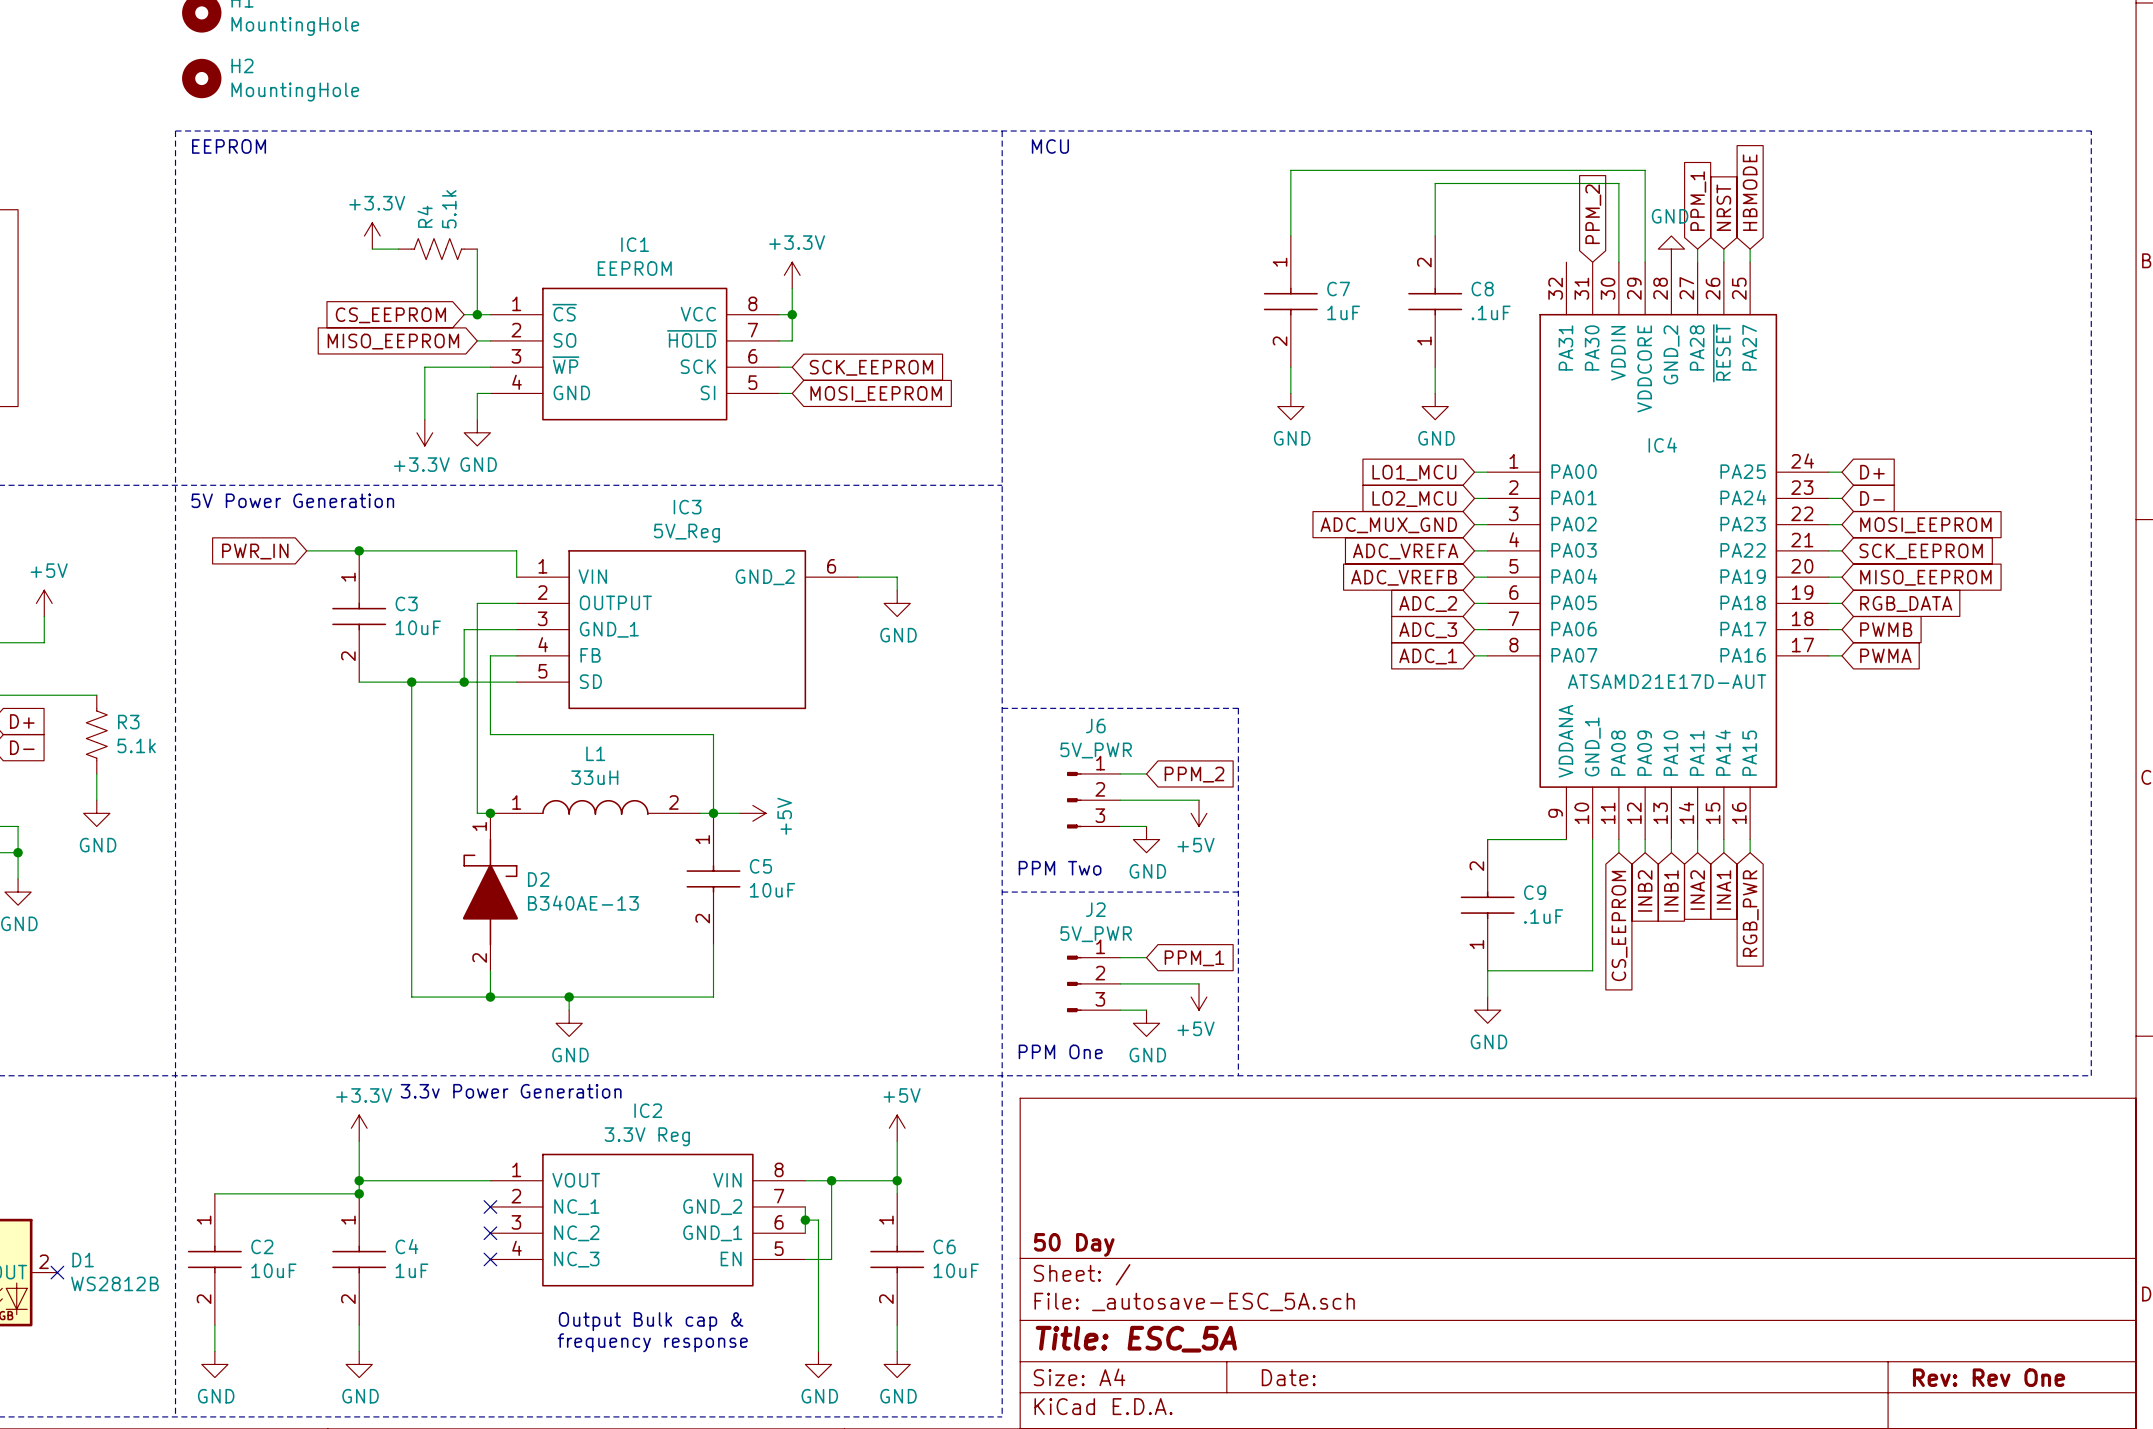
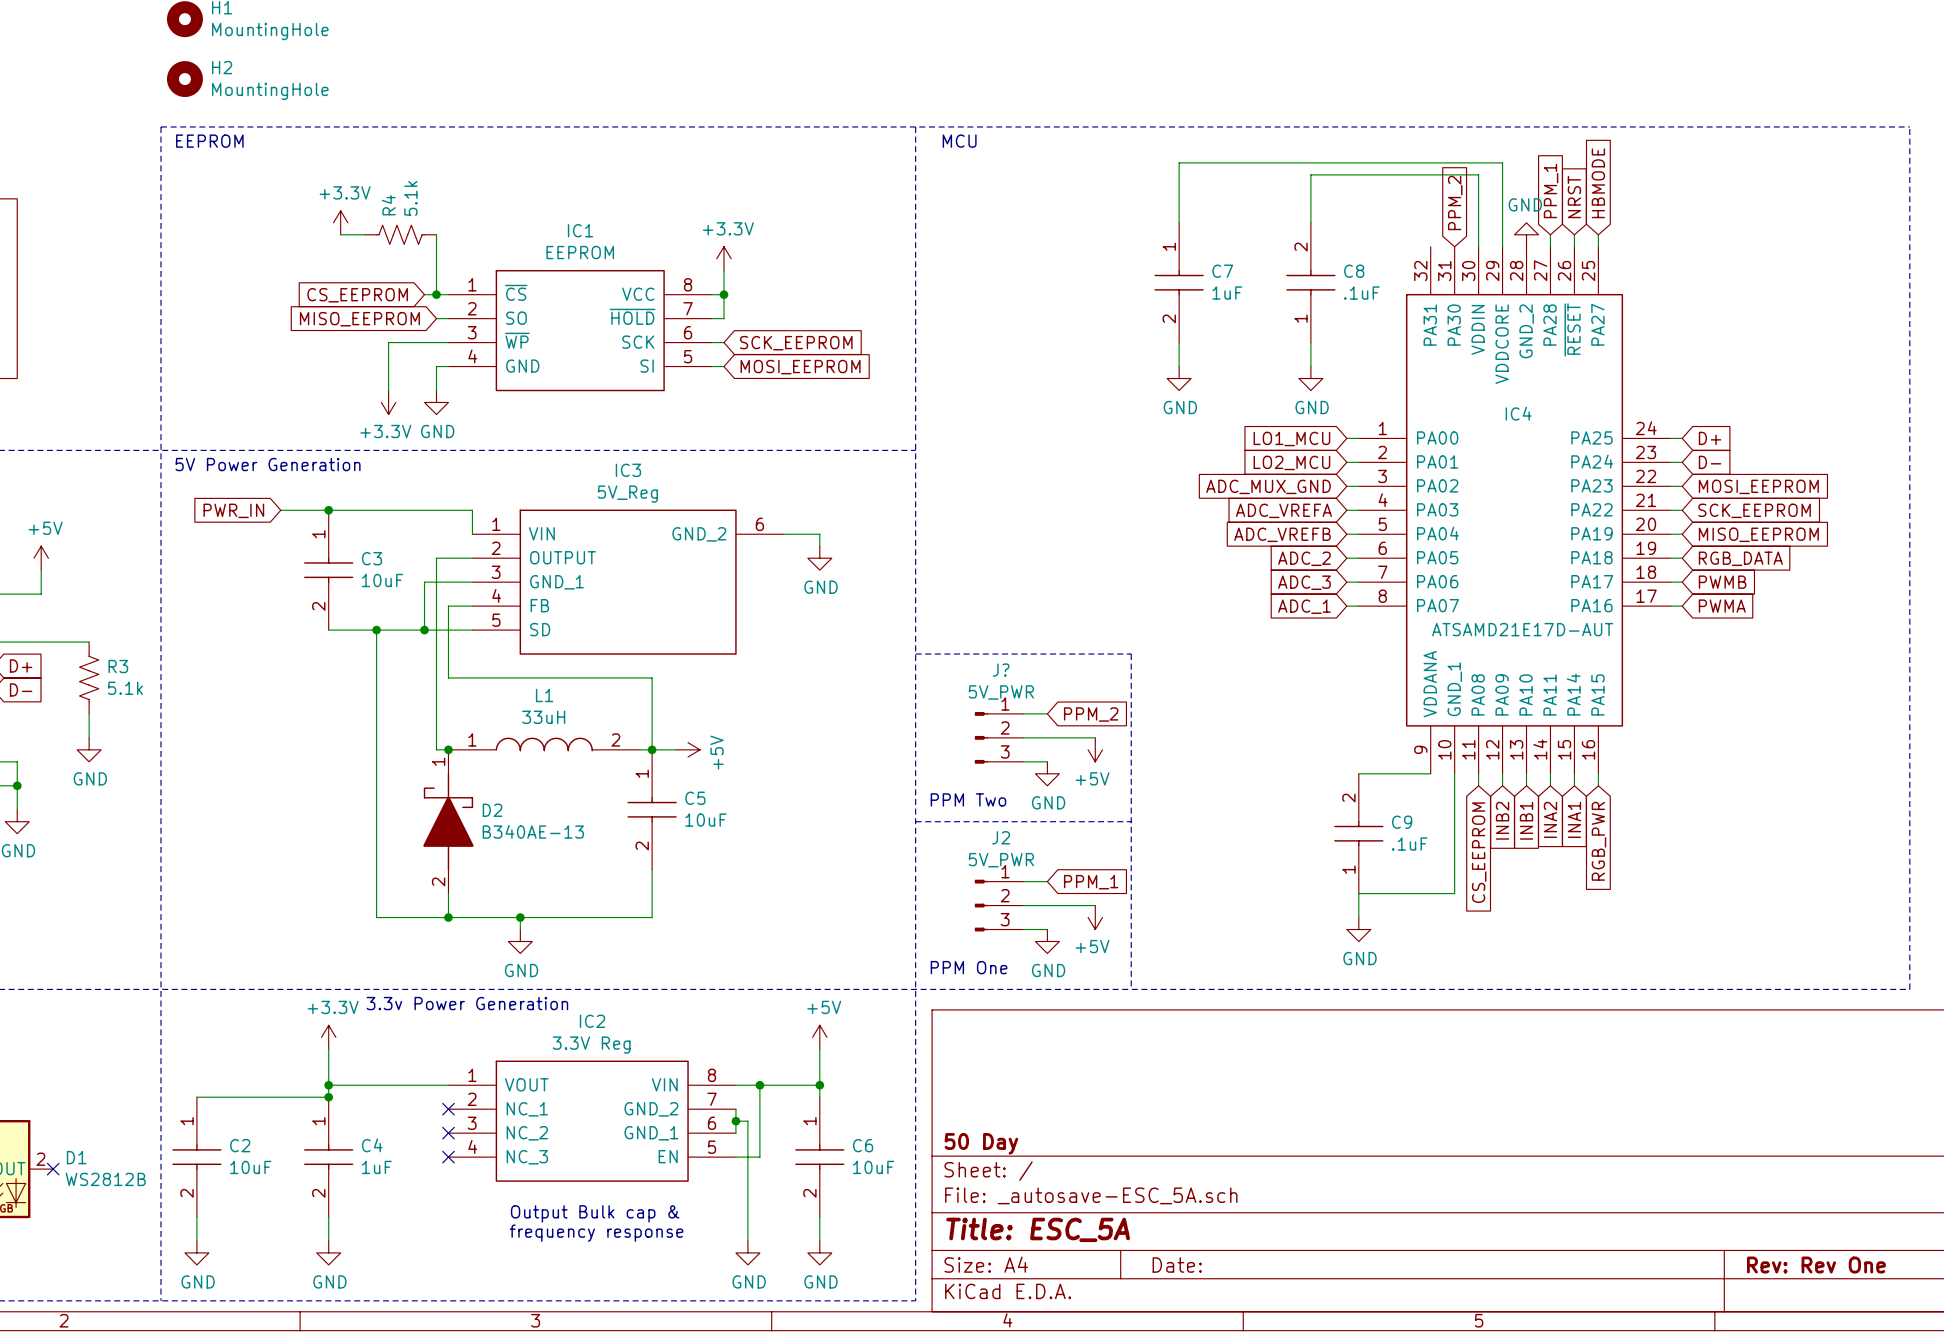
J6 name: J6 (1095, 725) -> J? (1001, 670)

